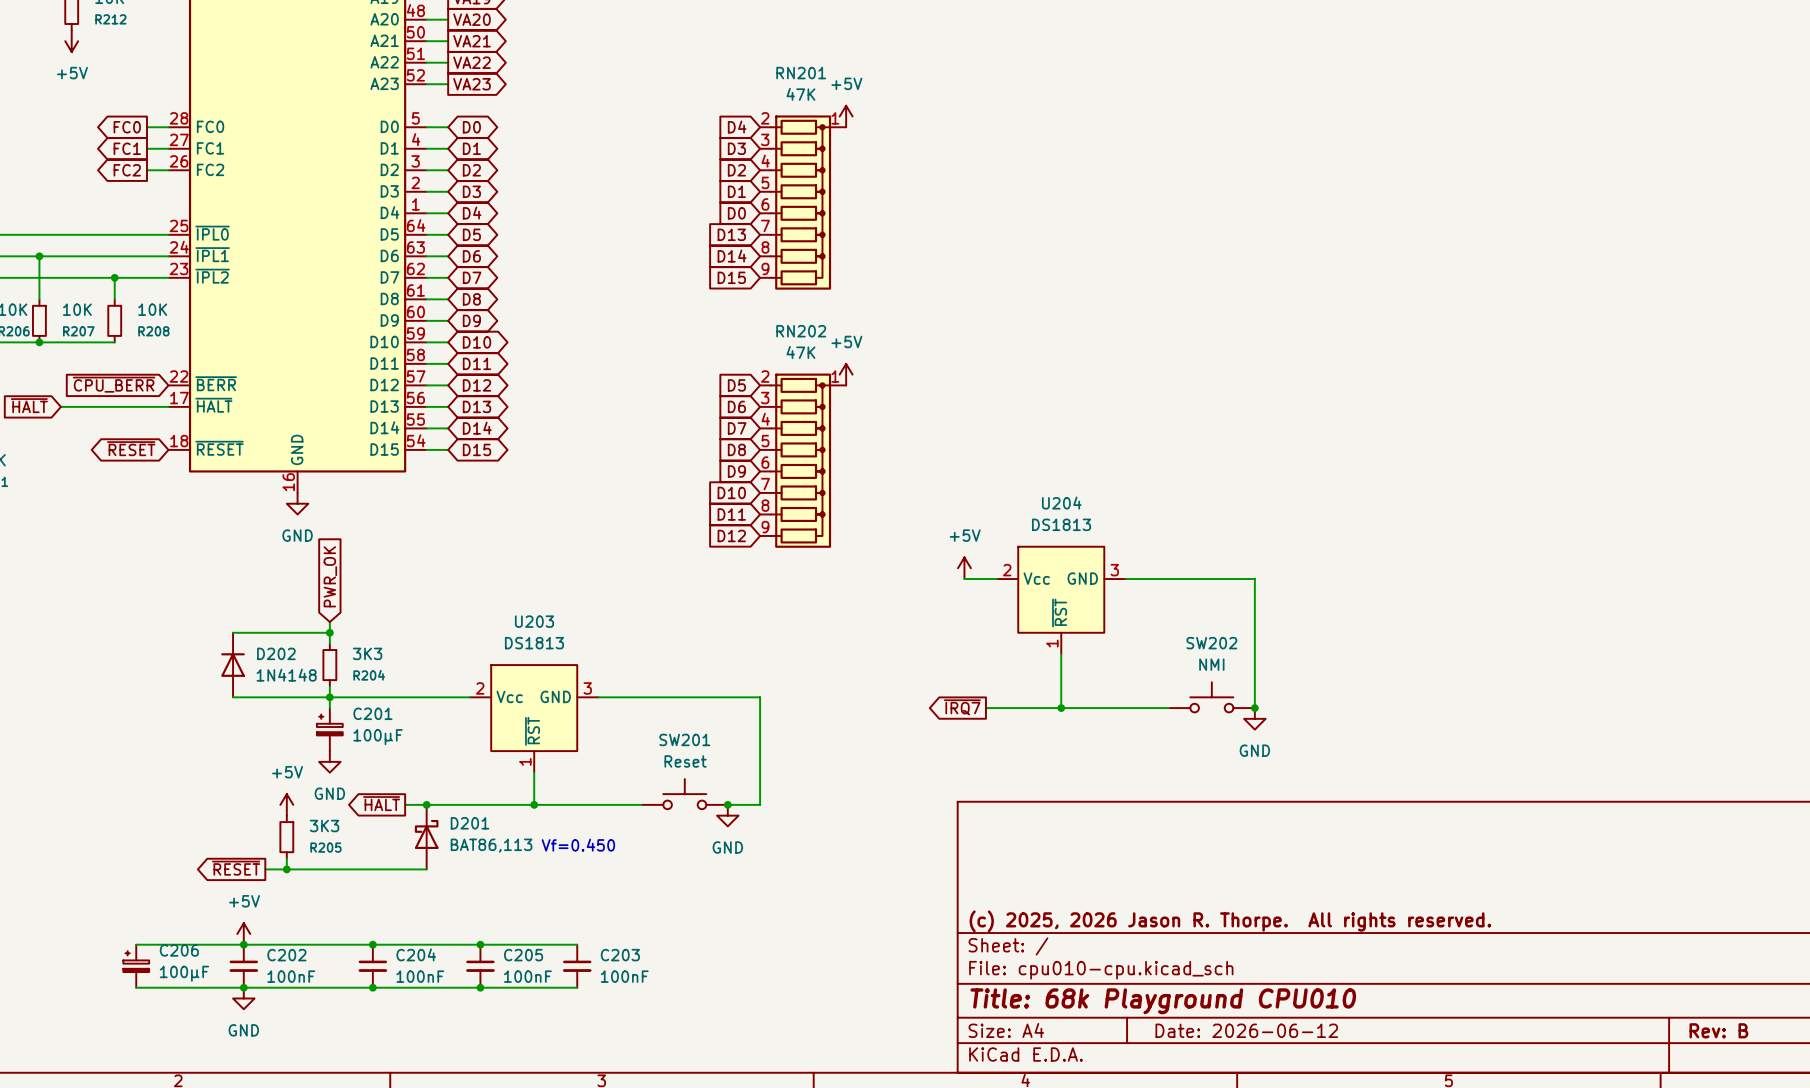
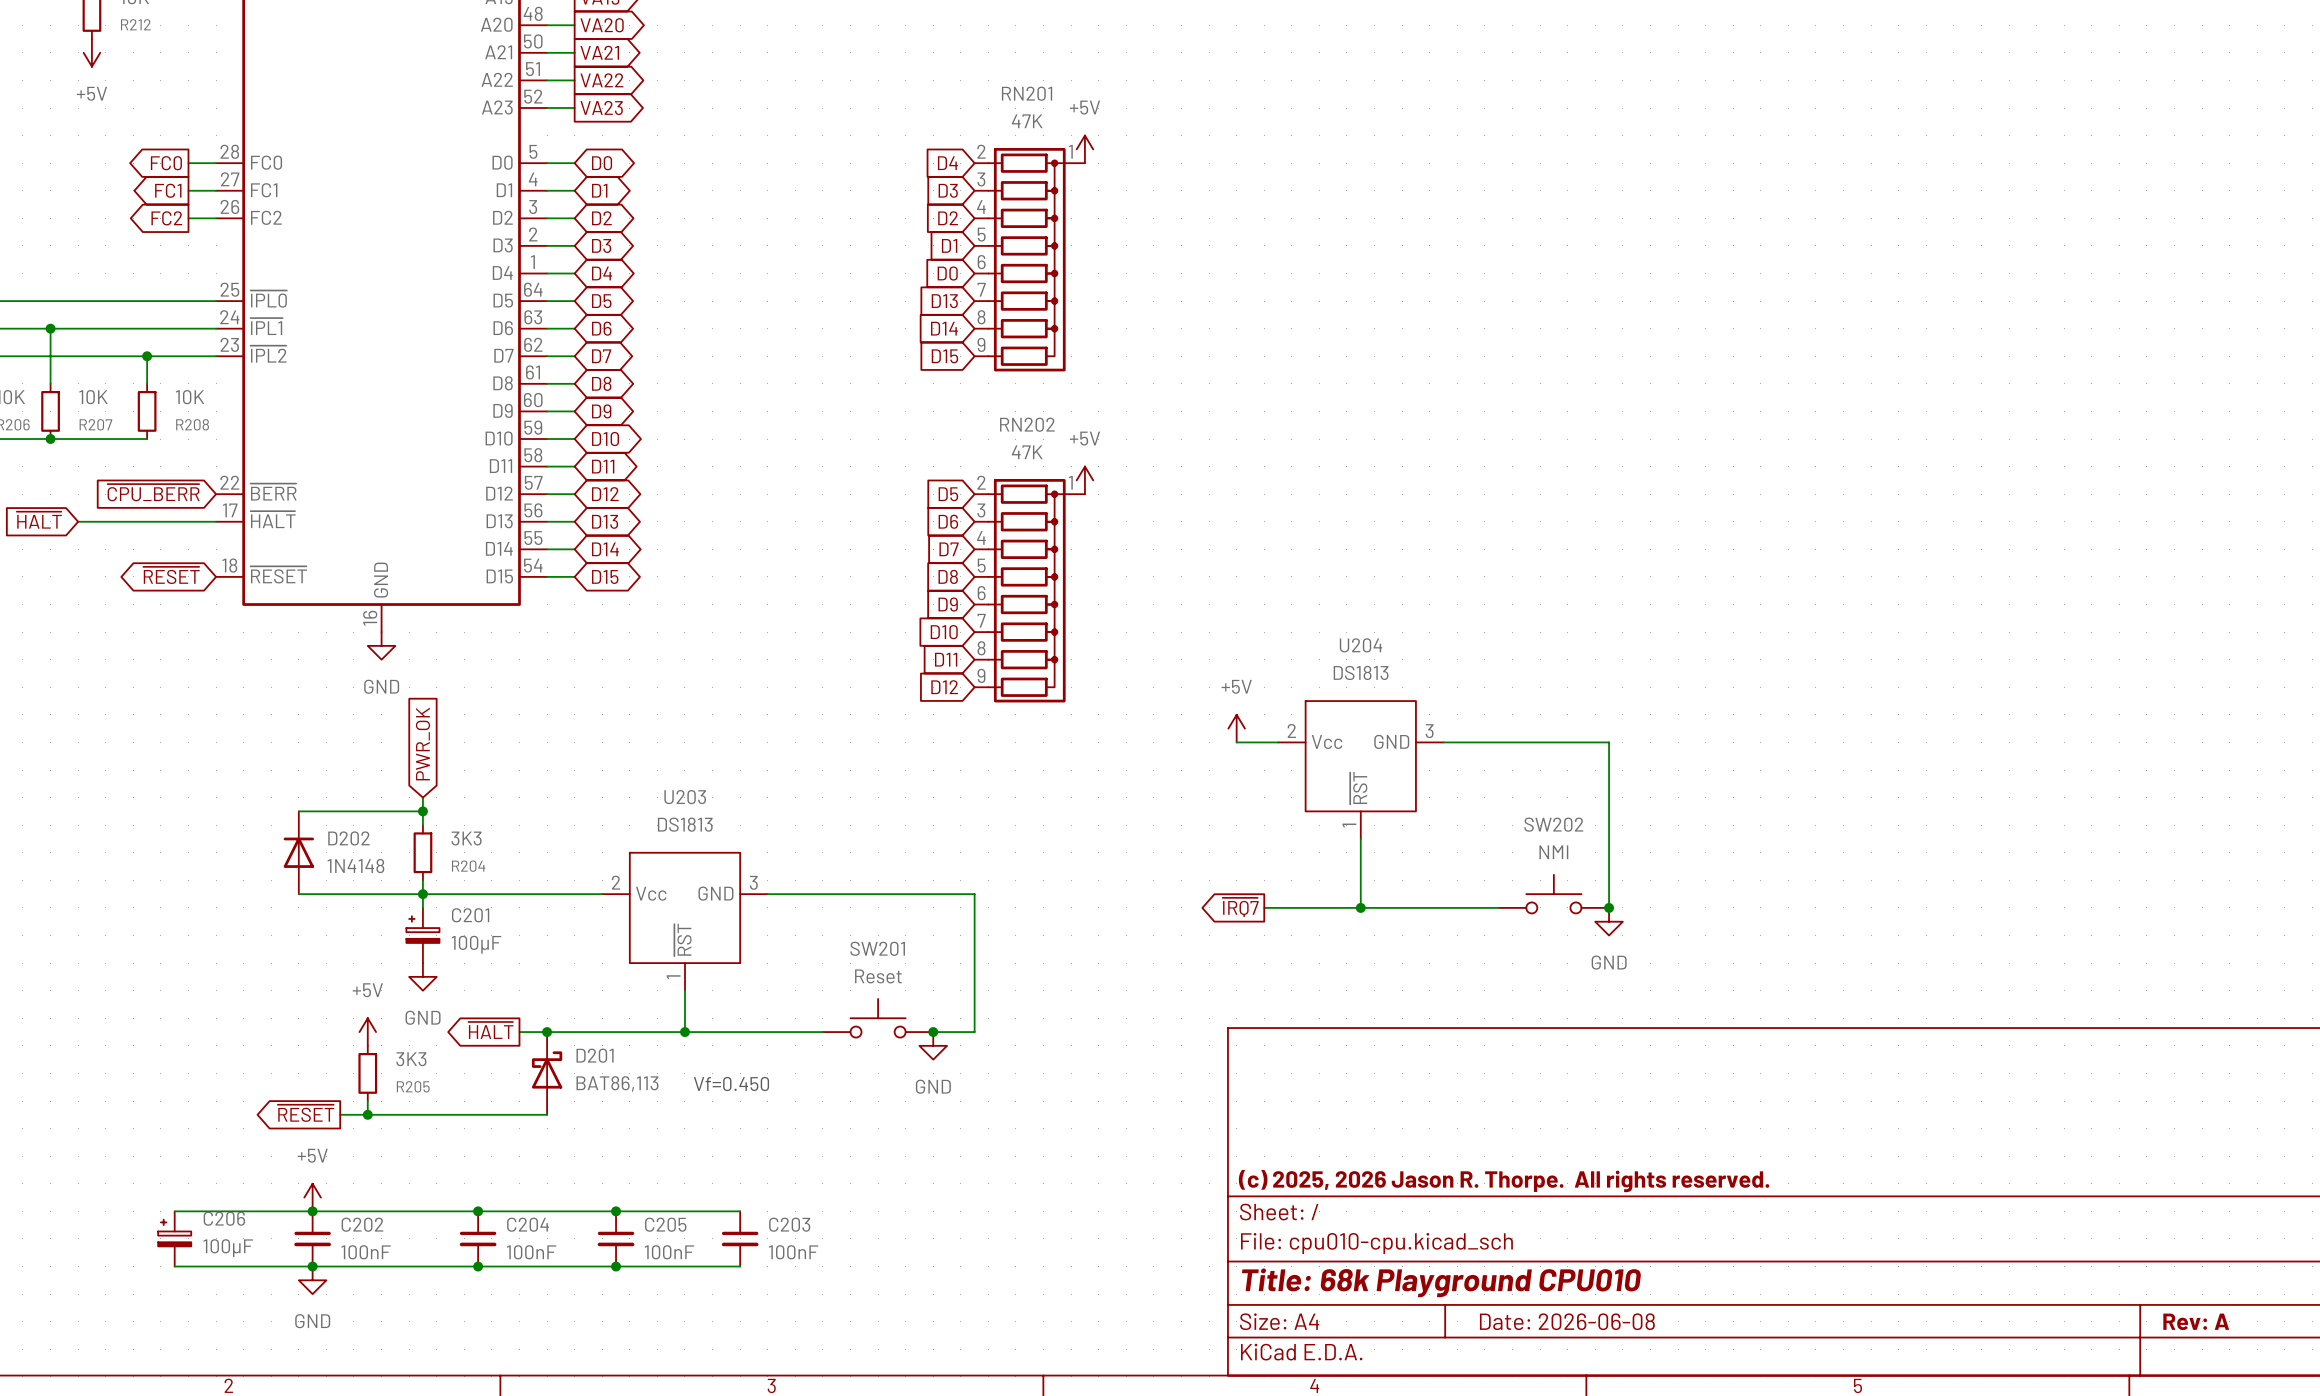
title block: Date: 2026-06-12 (1246, 1030) -> Date: 2026-06-08 (1567, 1321)
title block: Rev: B (1718, 1030) -> Rev: A (2196, 1321)

